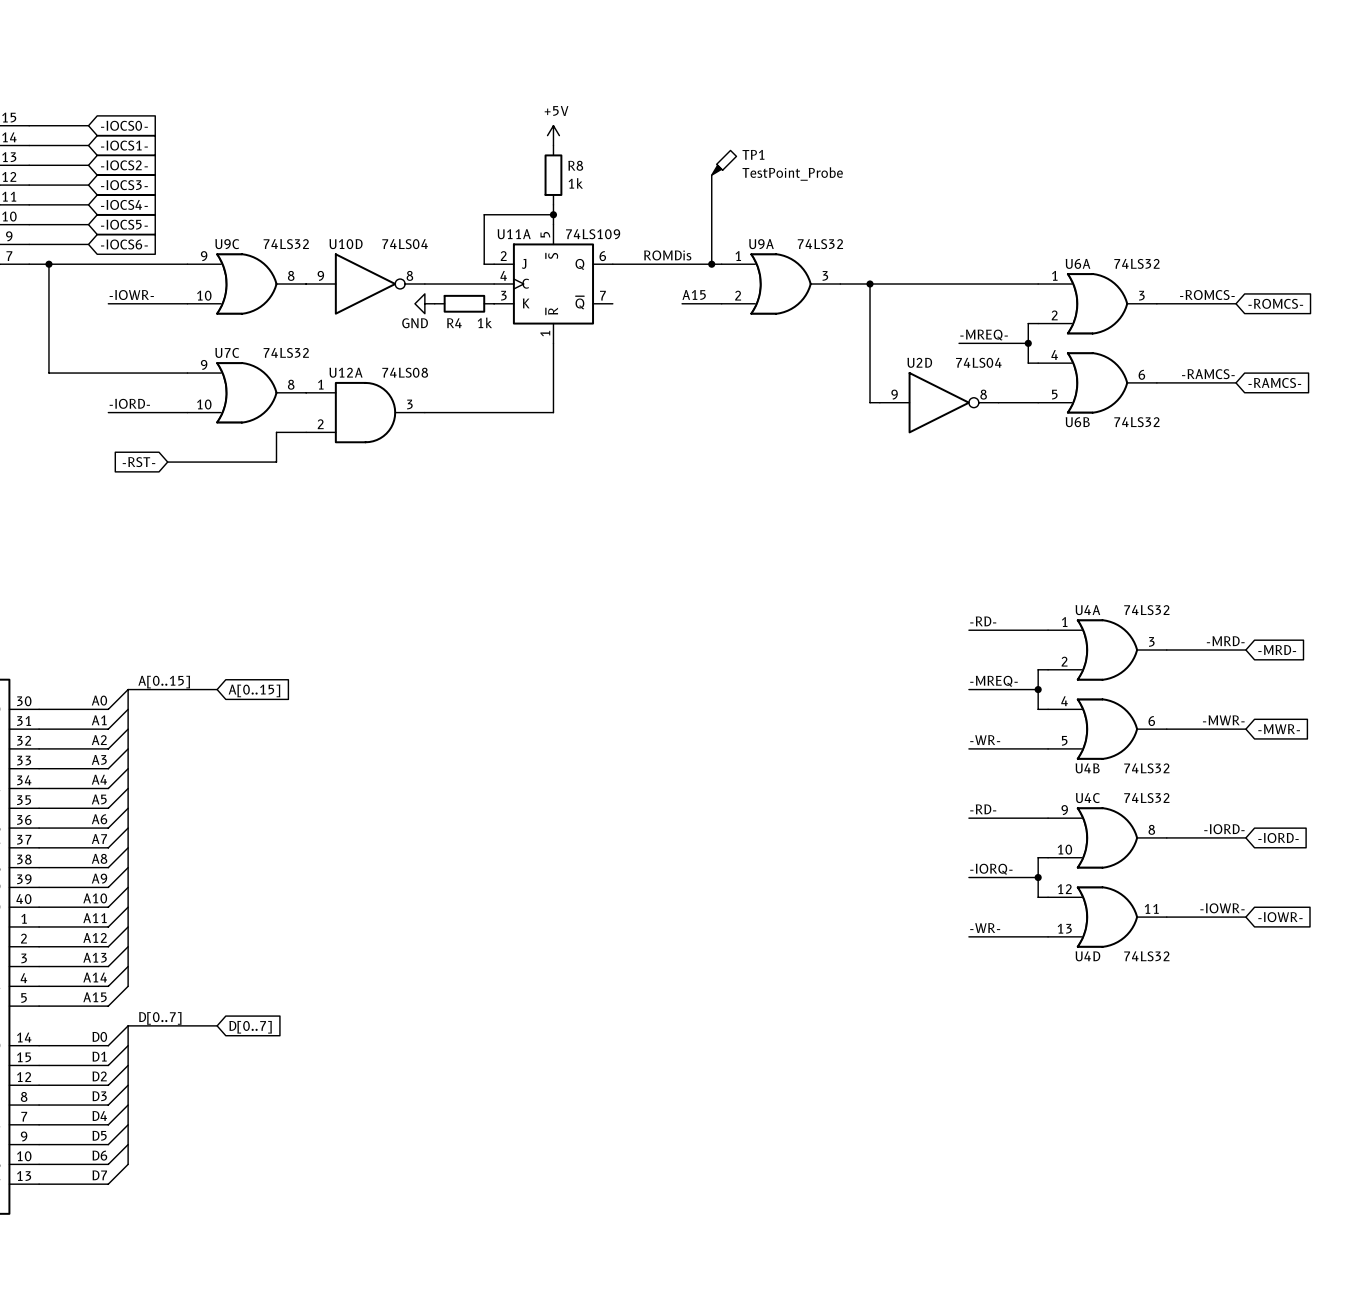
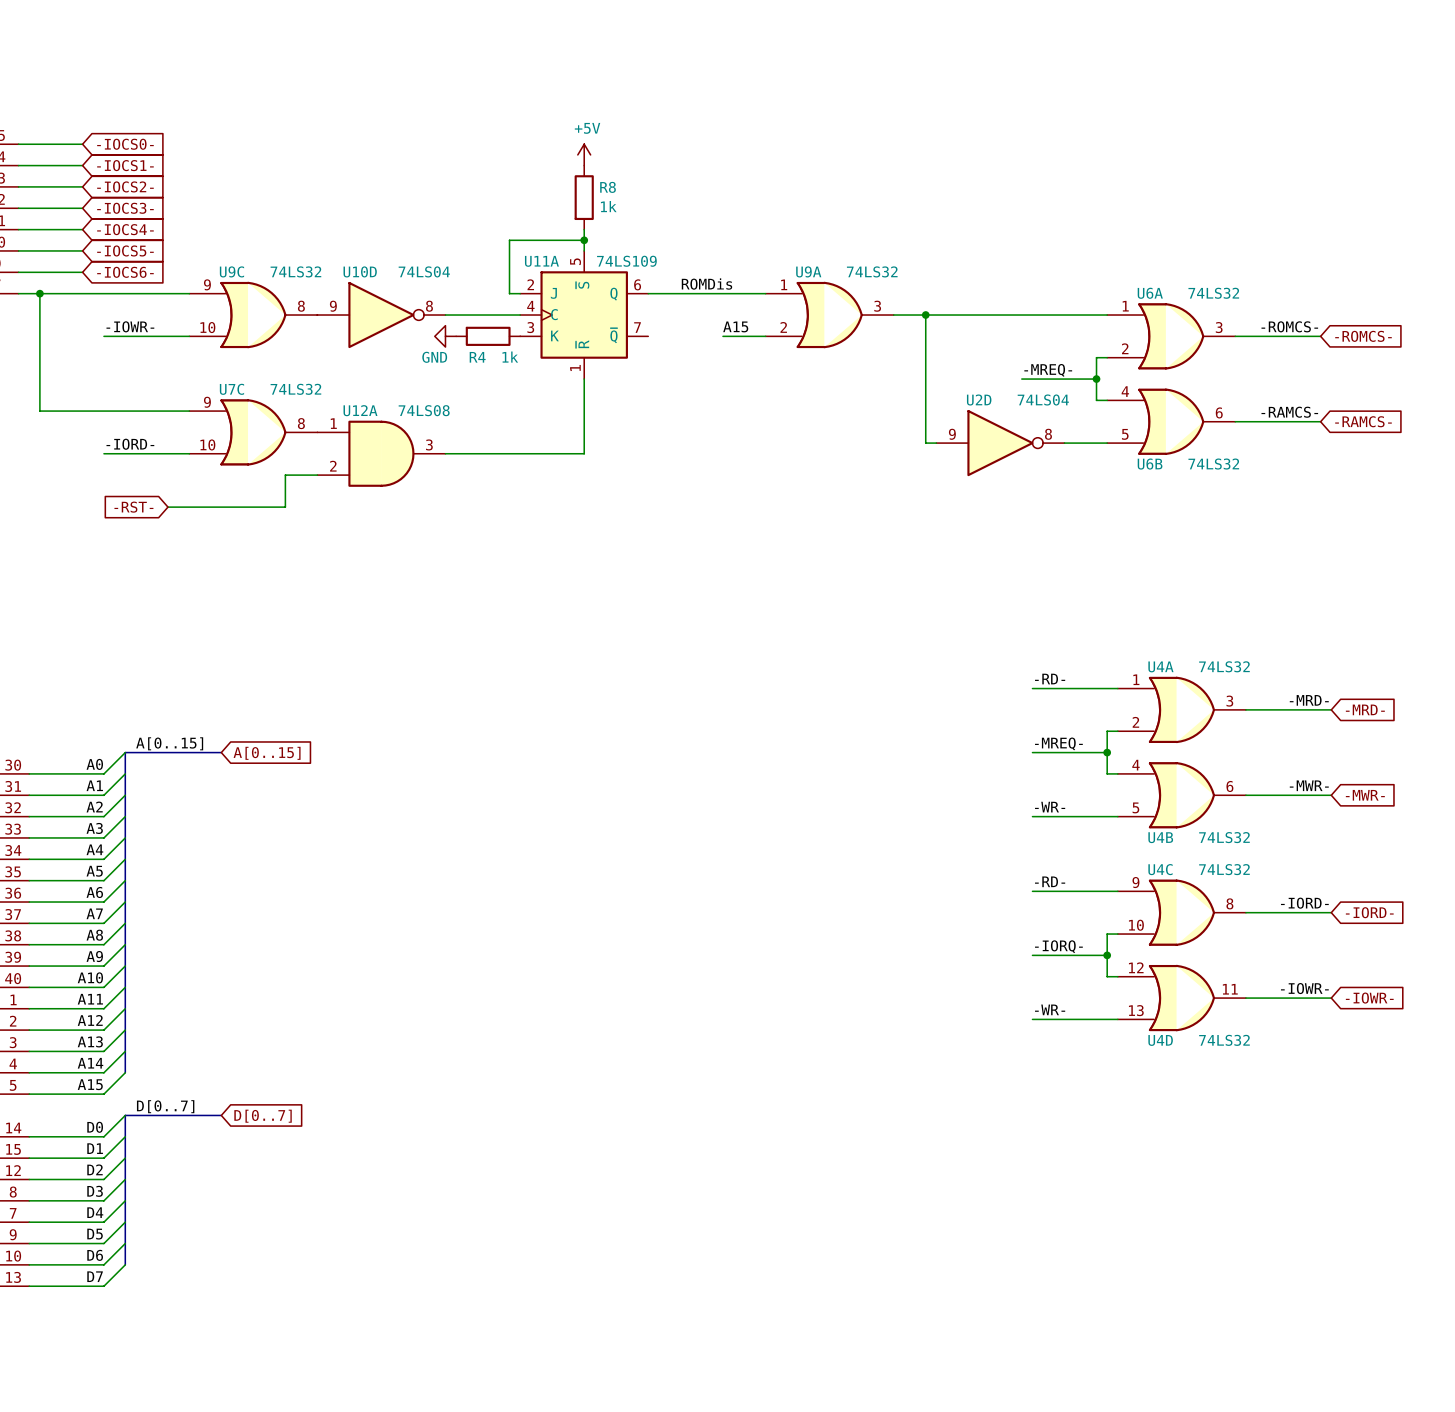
TP1: TestPoint_Probe (724, 162) -> none
wire: (711, 175) (711, 264) -> none
junction: (711, 264) -> none

